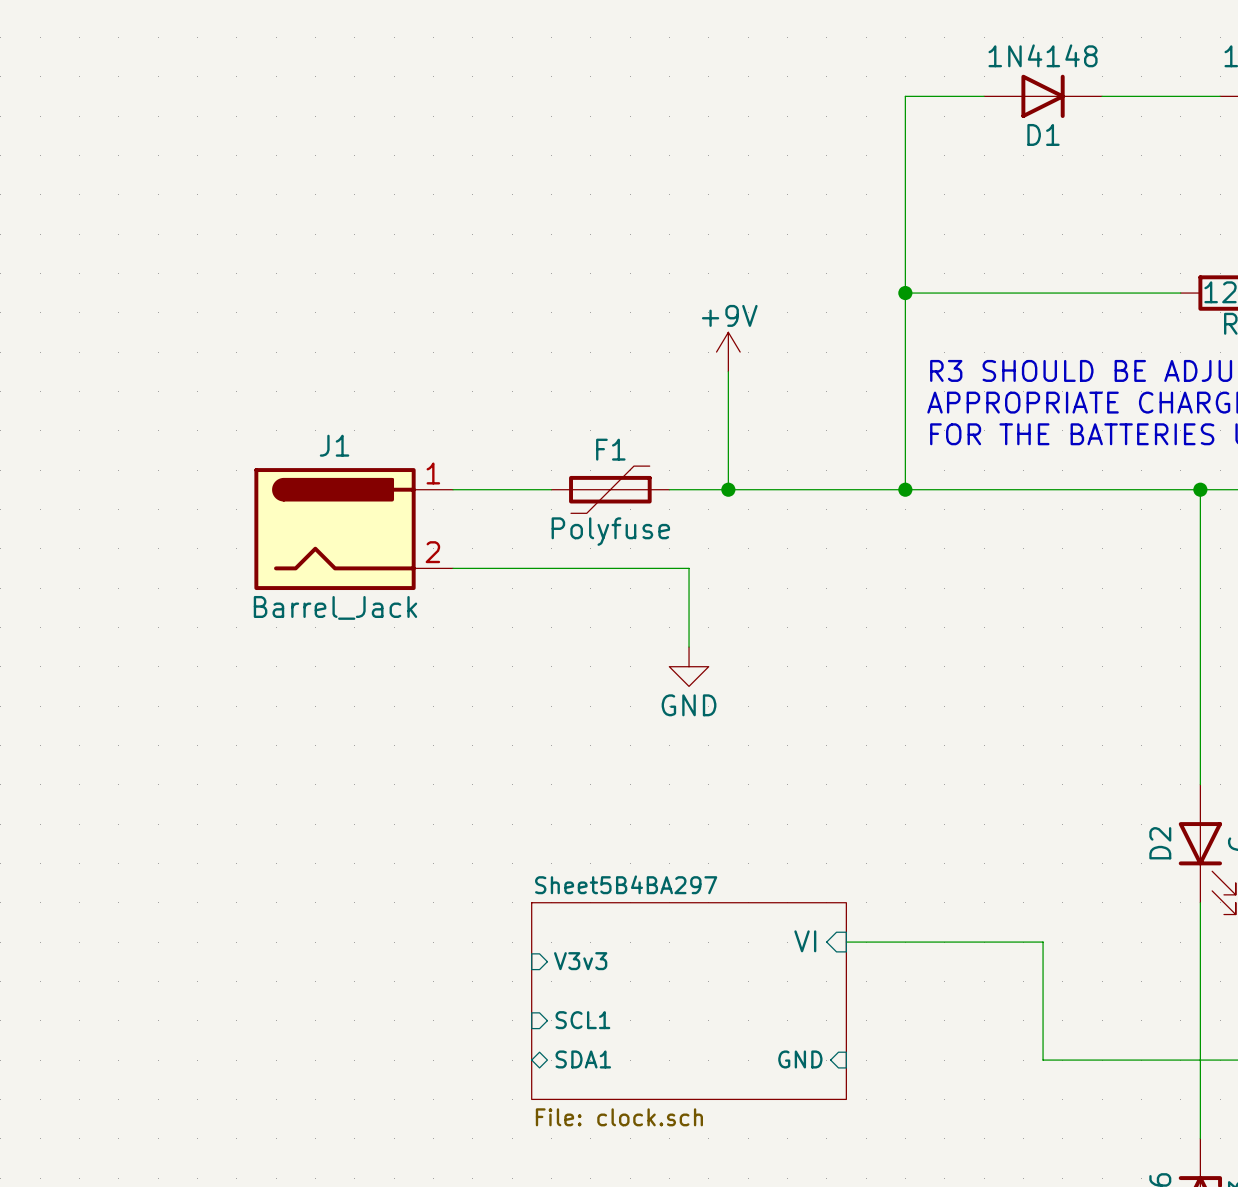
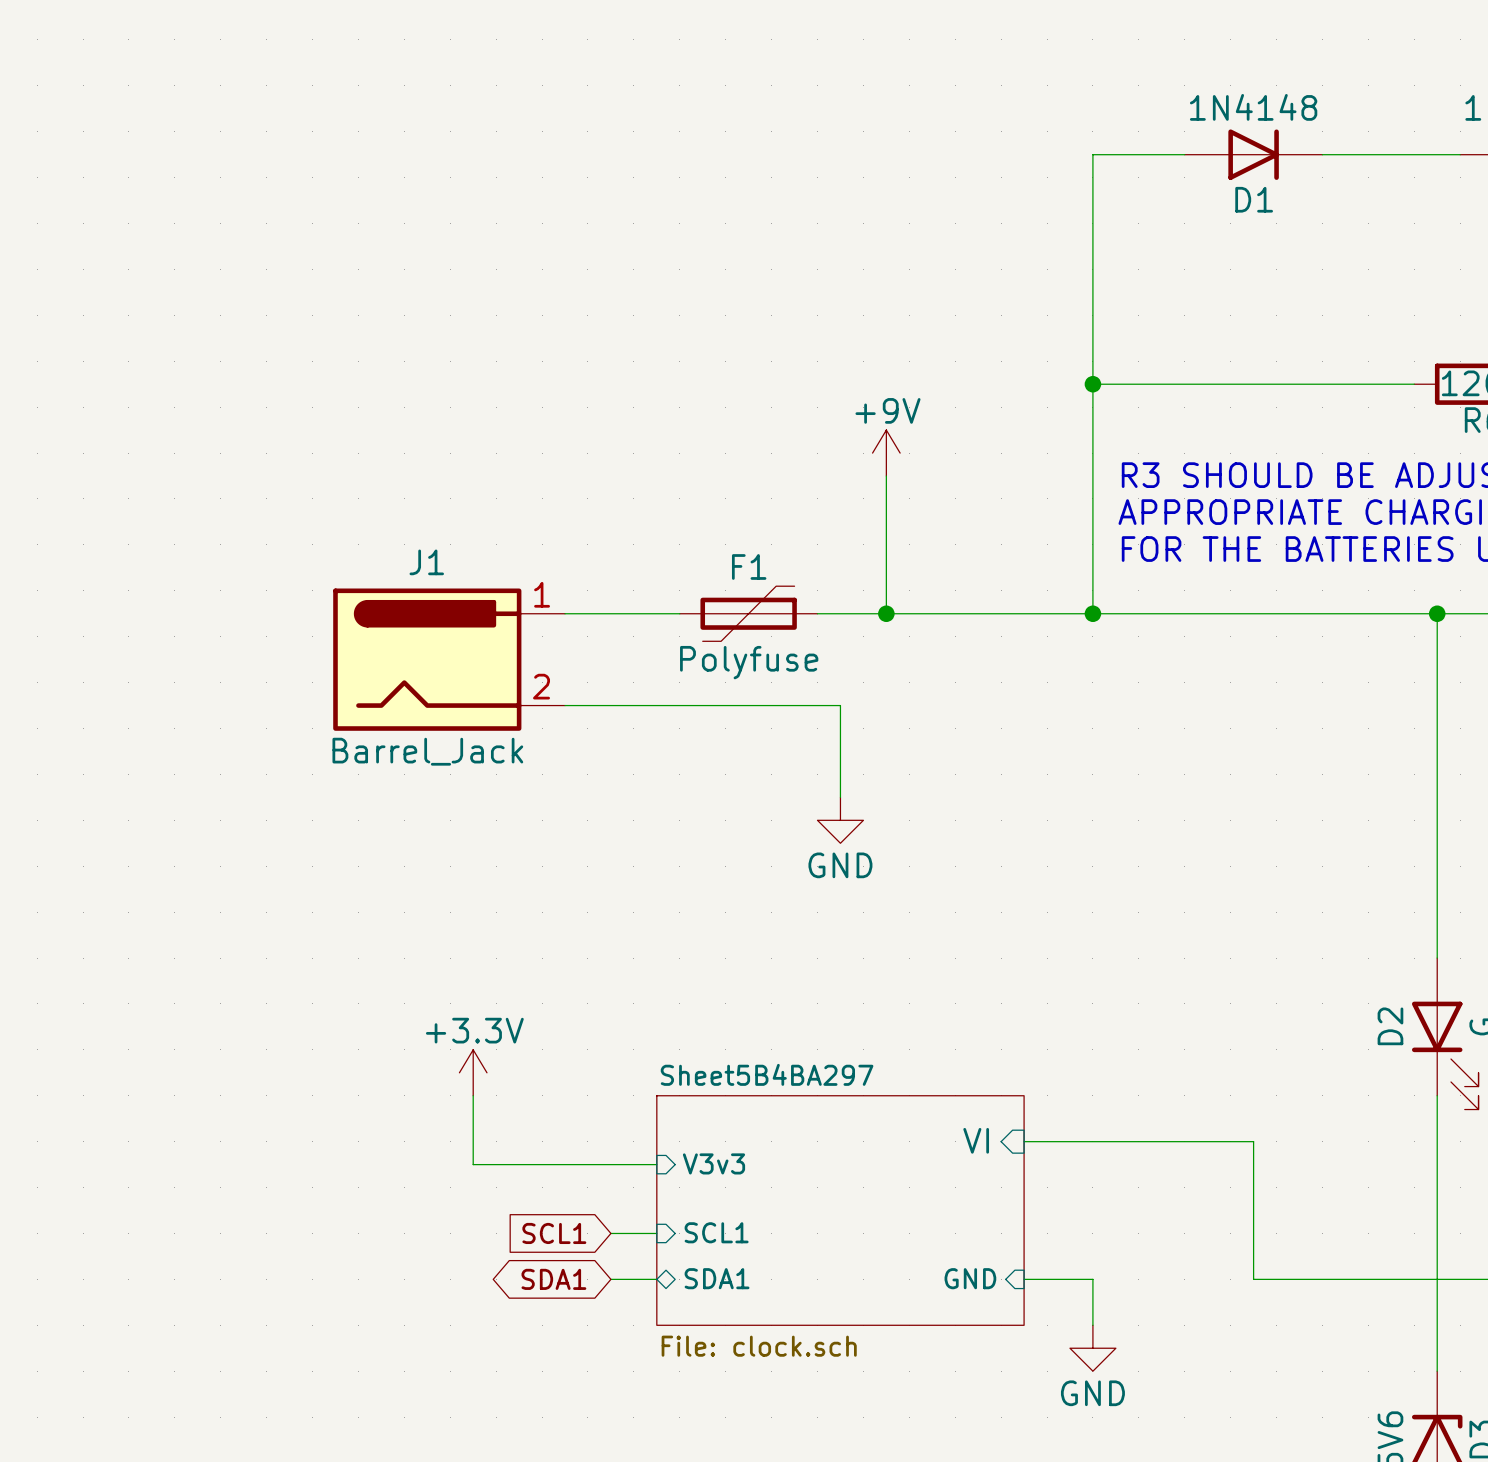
power symbol: none -> +3.3V (473, 1072)
wire: none -> (473, 1095) (473, 1164) (656, 1164)
global label: none -> SCL1 (554, 1233)
wire: none -> (610, 1233) (656, 1233)
global label: none -> SDA1 (553, 1279)
wire: none -> (610, 1279) (656, 1279)
wire: none -> (1024, 1279) (1092, 1279) (1092, 1325)
power symbol: none -> GND (1092, 1348)

